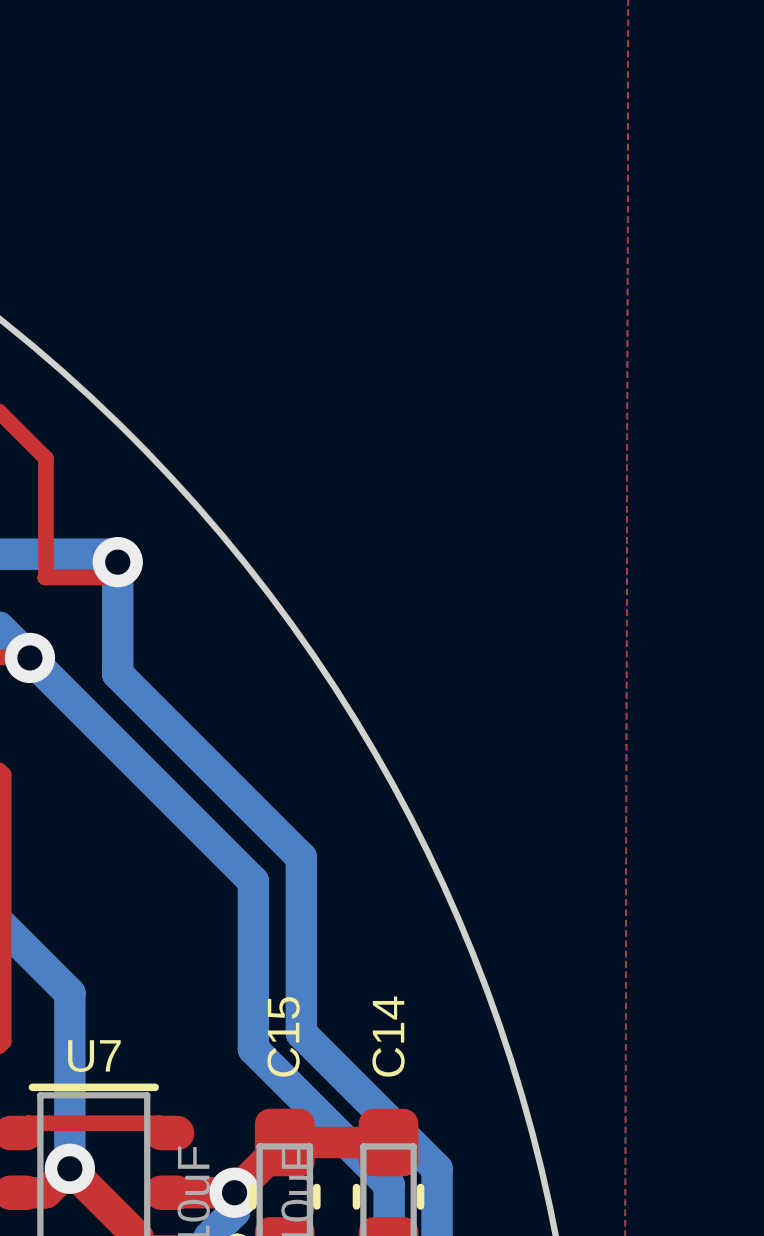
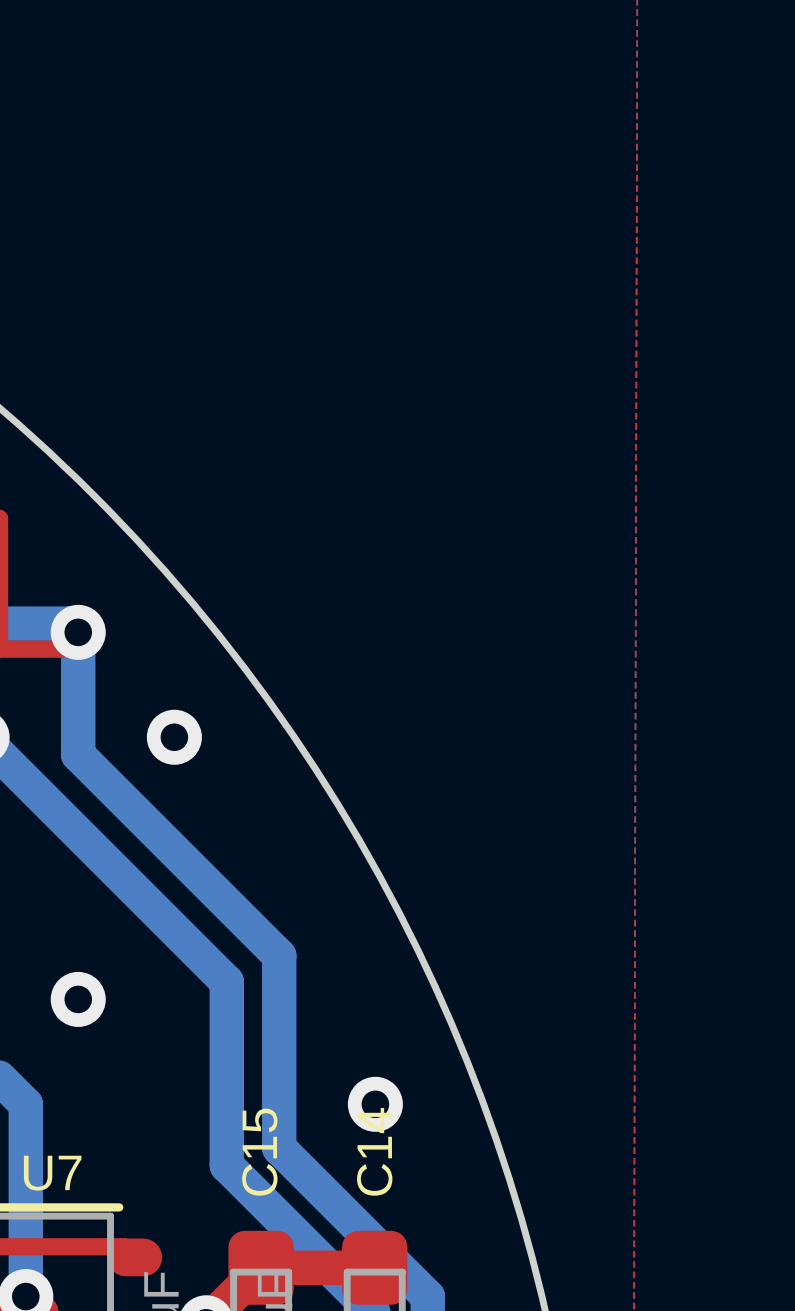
via: none -> (174, 737)
via: none -> (78, 999)
via: none -> (375, 1104)

